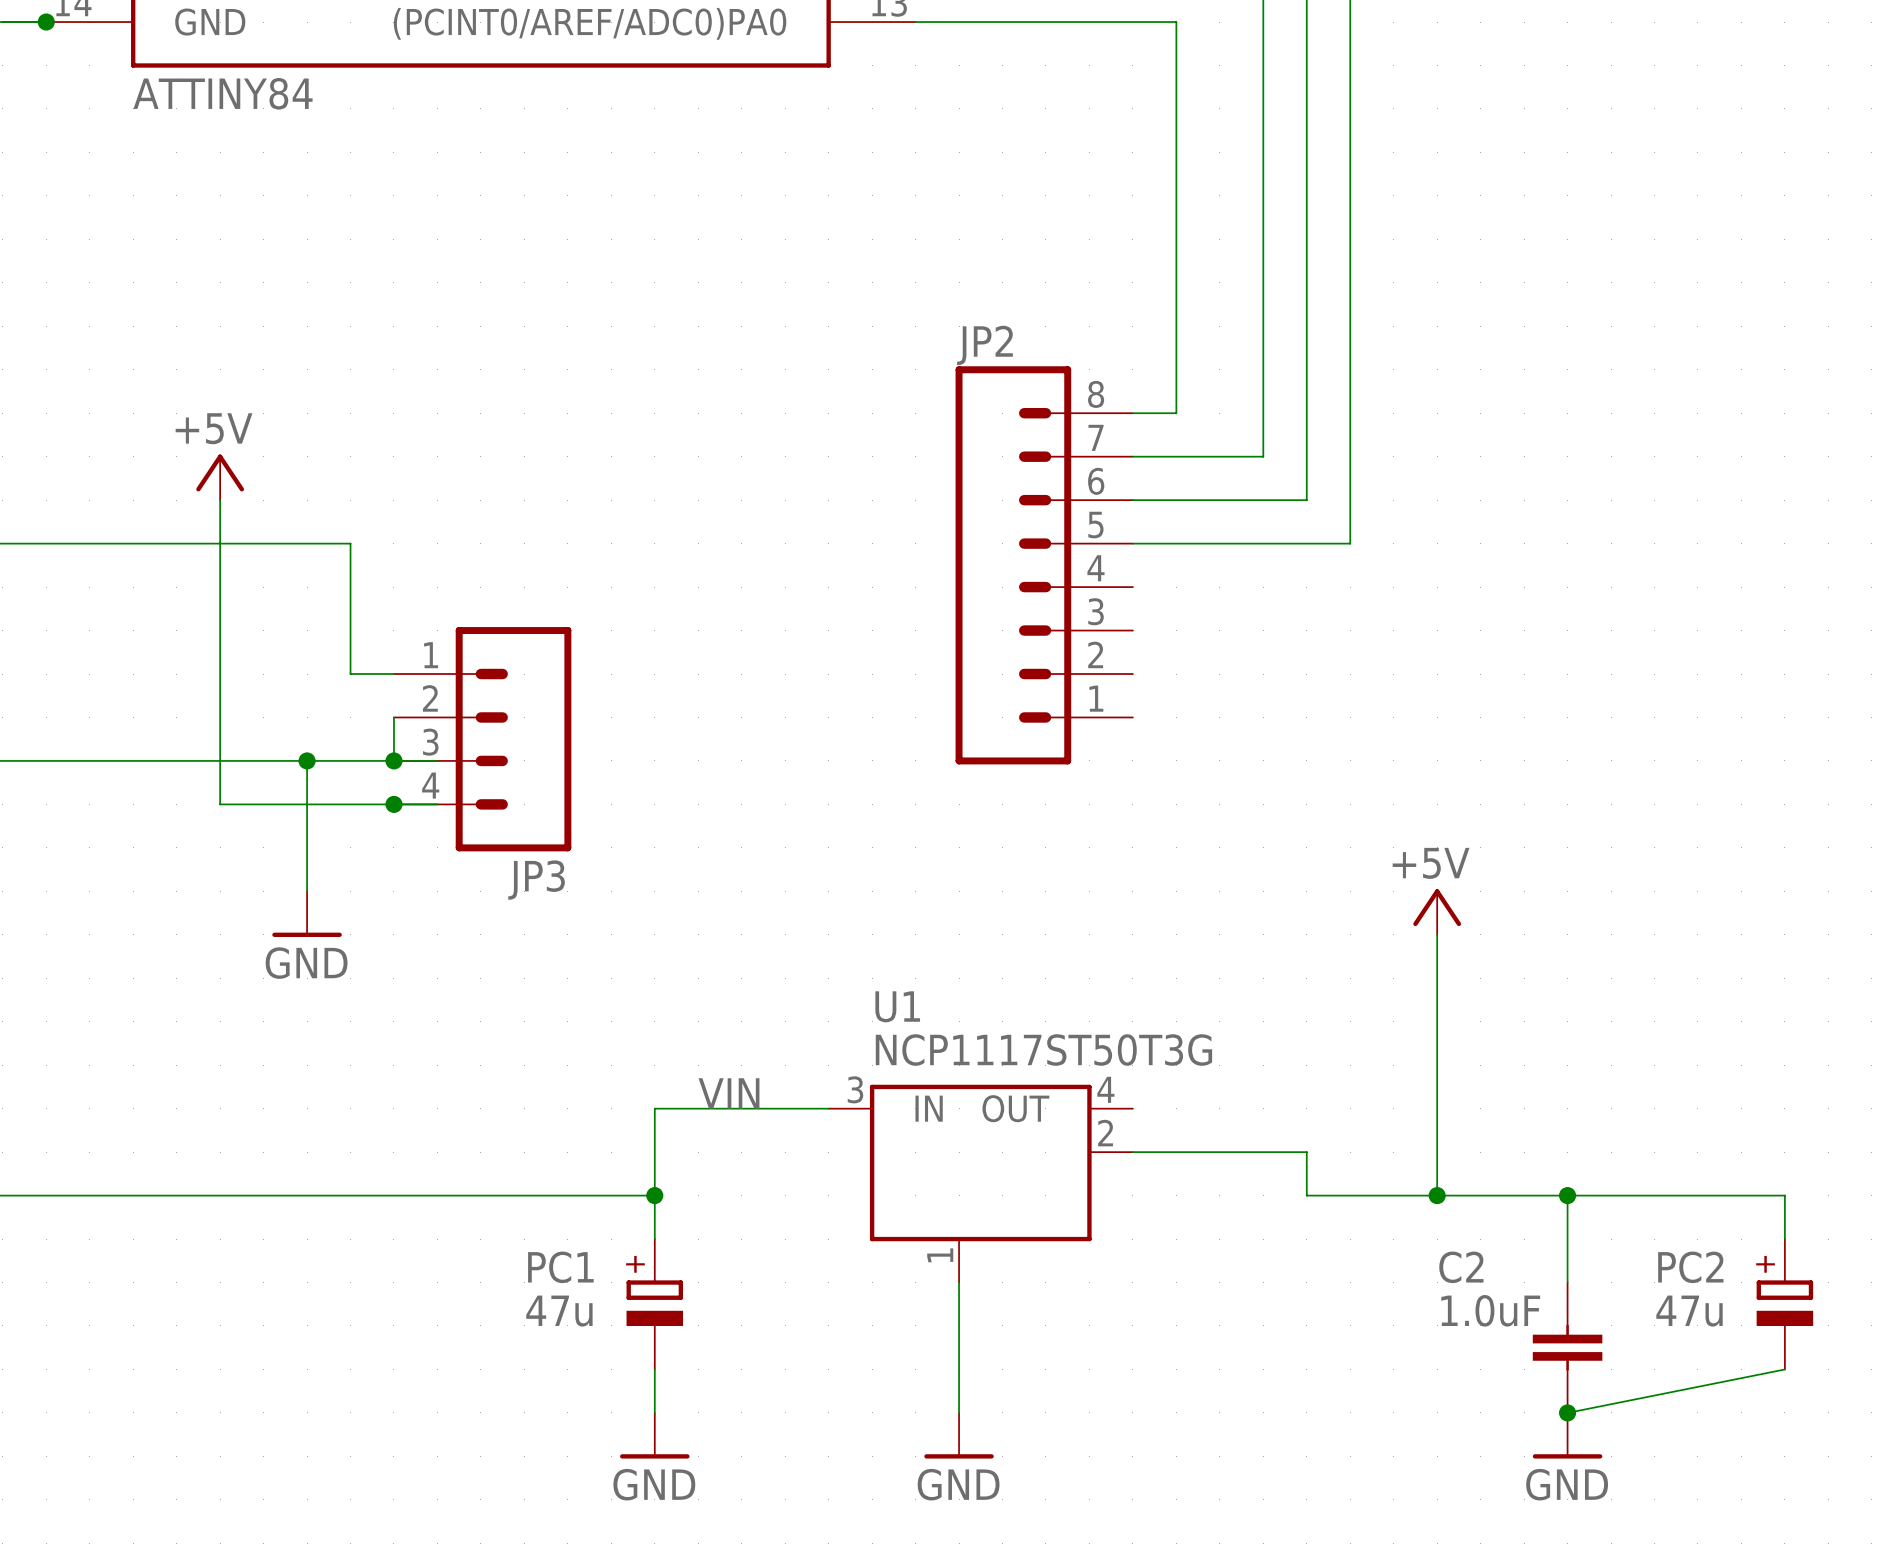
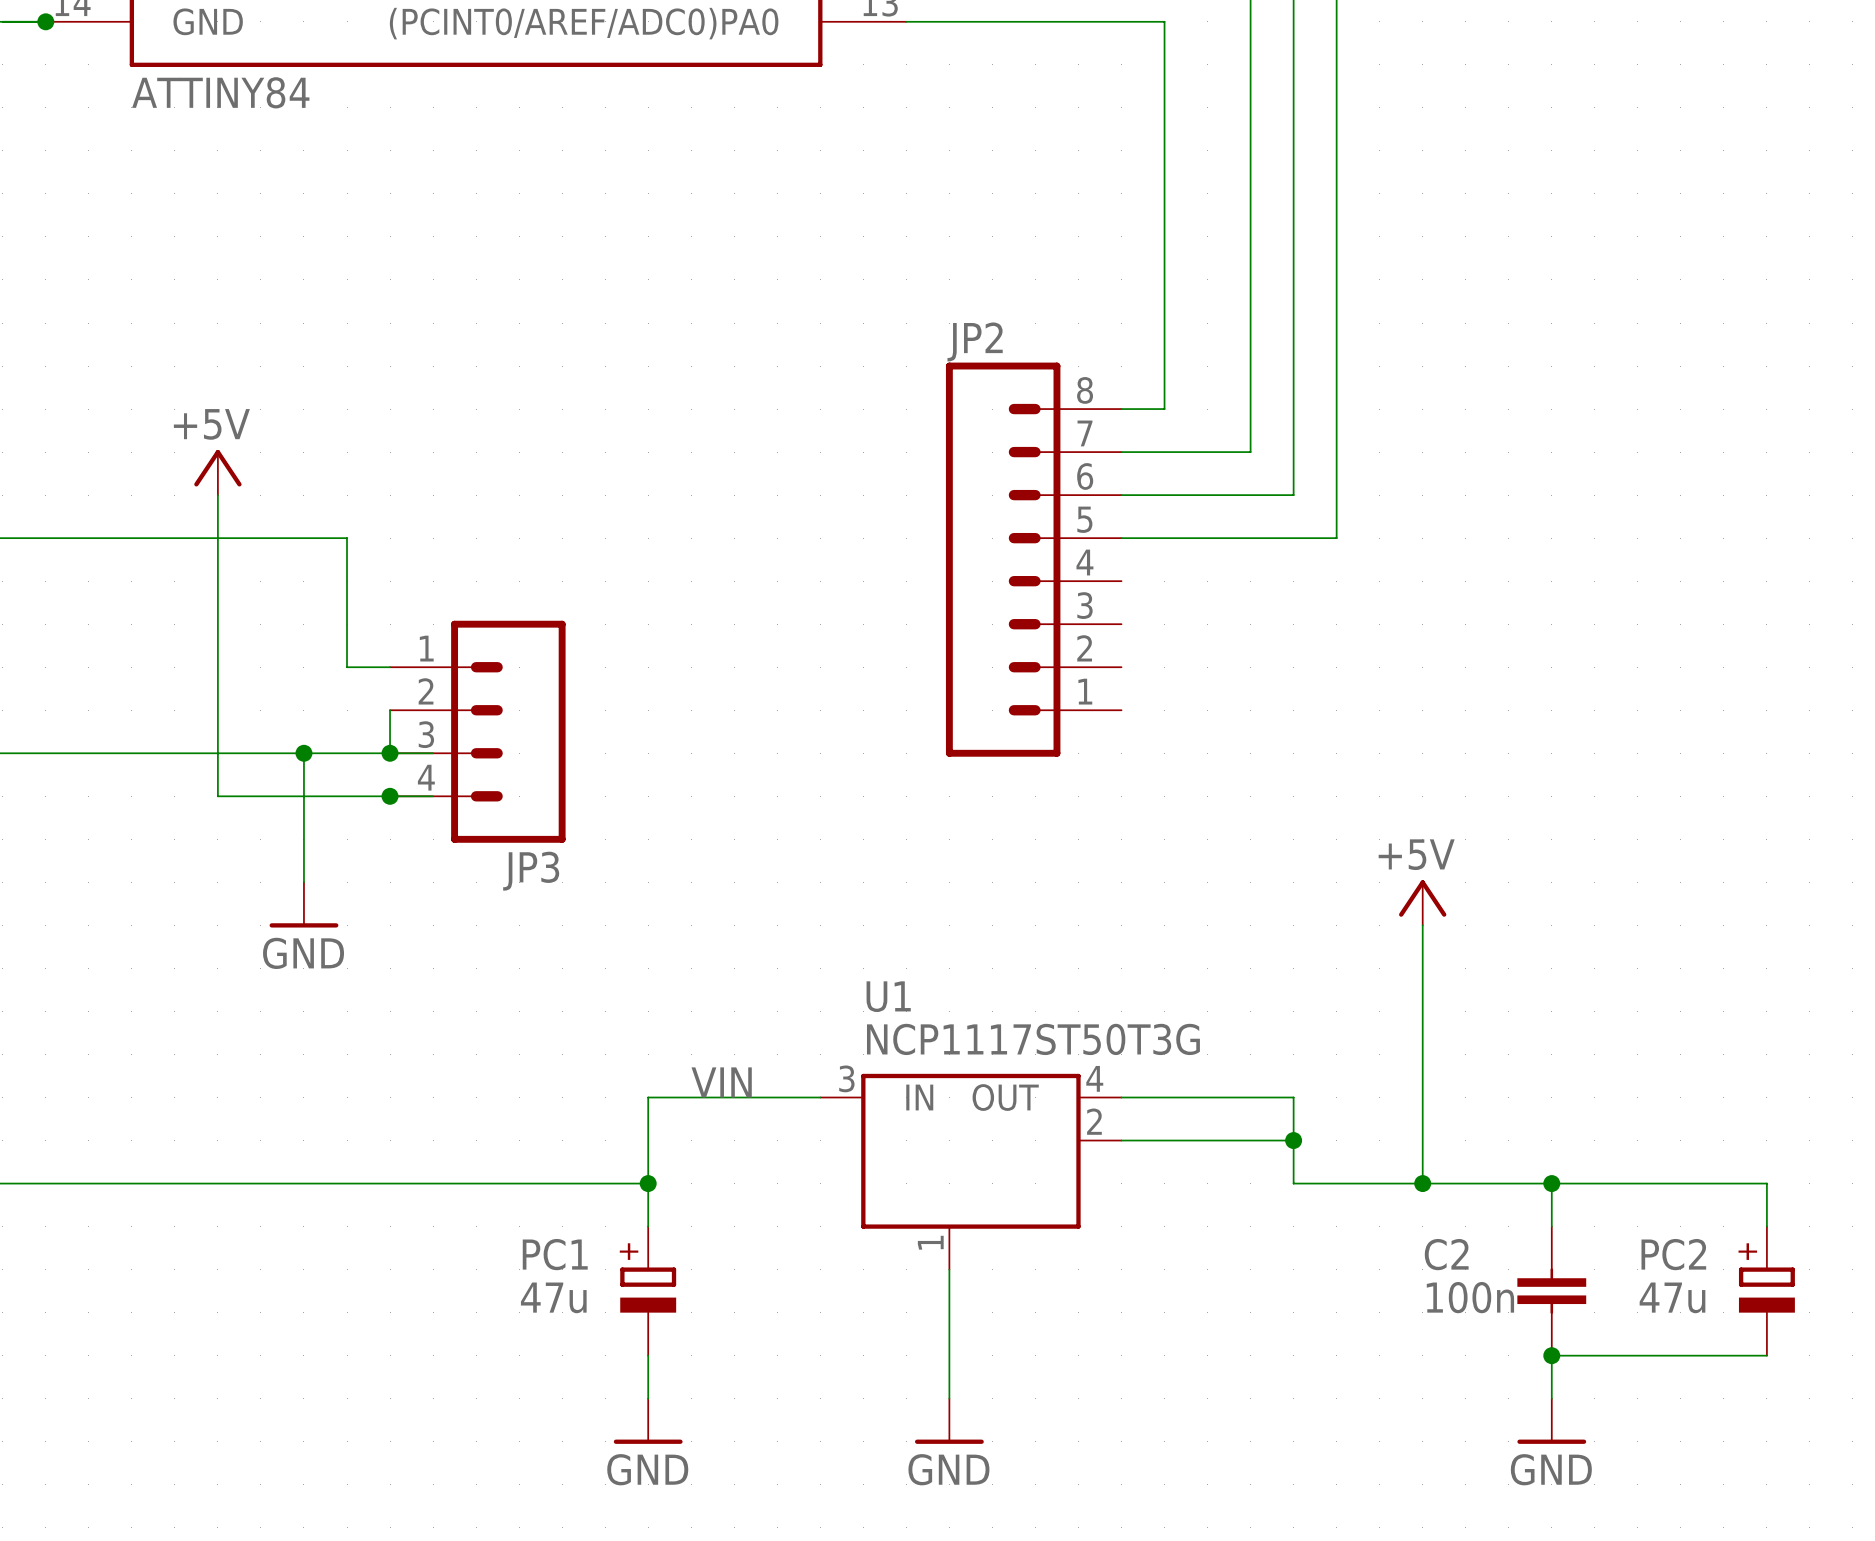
wire: none -> (1121, 1097) (1293, 1097) (1293, 1140)
junction: none -> (1293, 1140)
C2 value: 1.0uF (1490, 1310) -> 100n (1470, 1297)
C2 position: (1567, 1347) -> (1551, 1291)
wire: (1784, 1369) (1567, 1412) -> (1766, 1355) (1551, 1355) (1551, 1398)
junction position: (1567, 1412) -> (1551, 1355)

